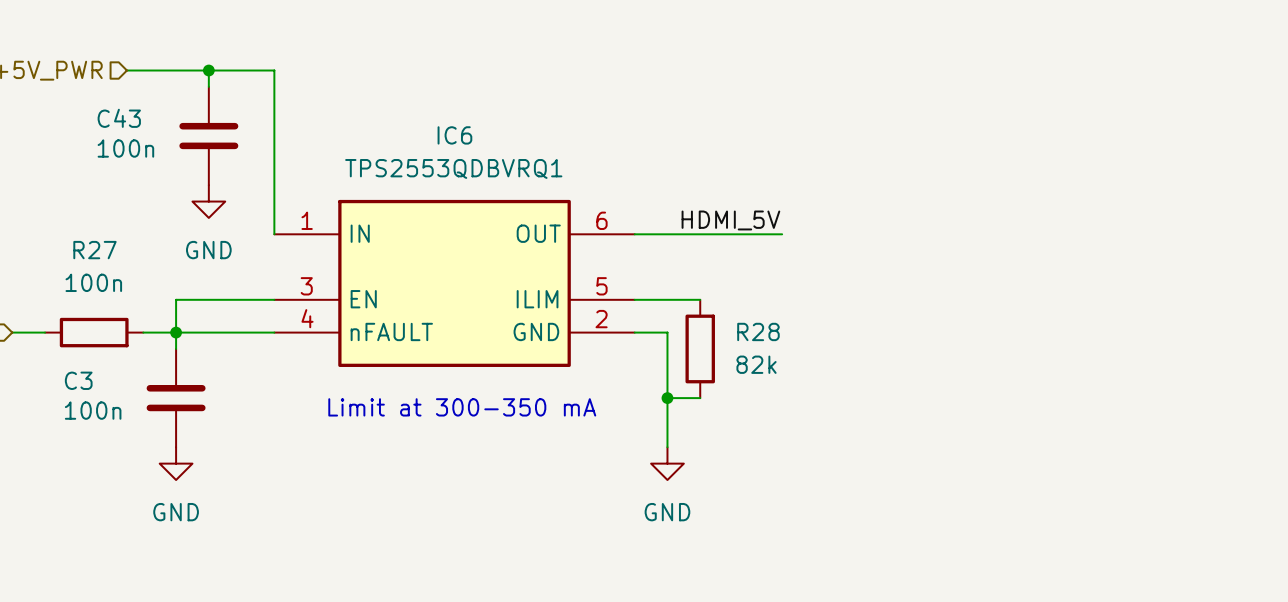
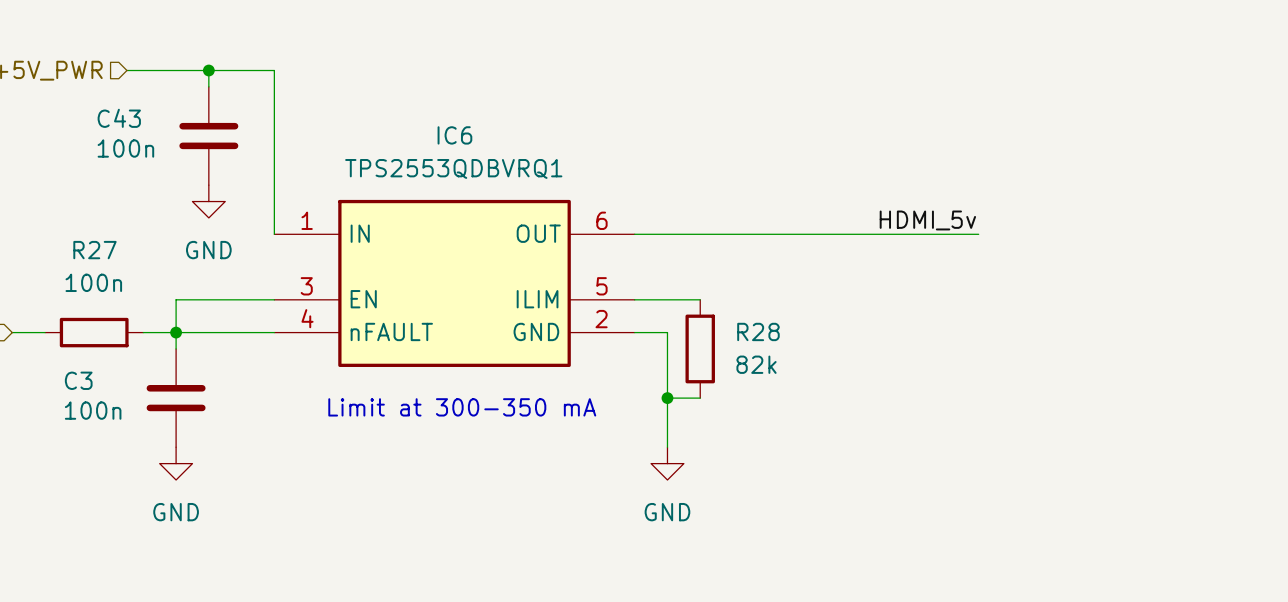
label: HDMI_5V (730, 220) -> none
label: none -> HDMI_5v (927, 220)
wire: none -> (782, 234) (978, 234)

